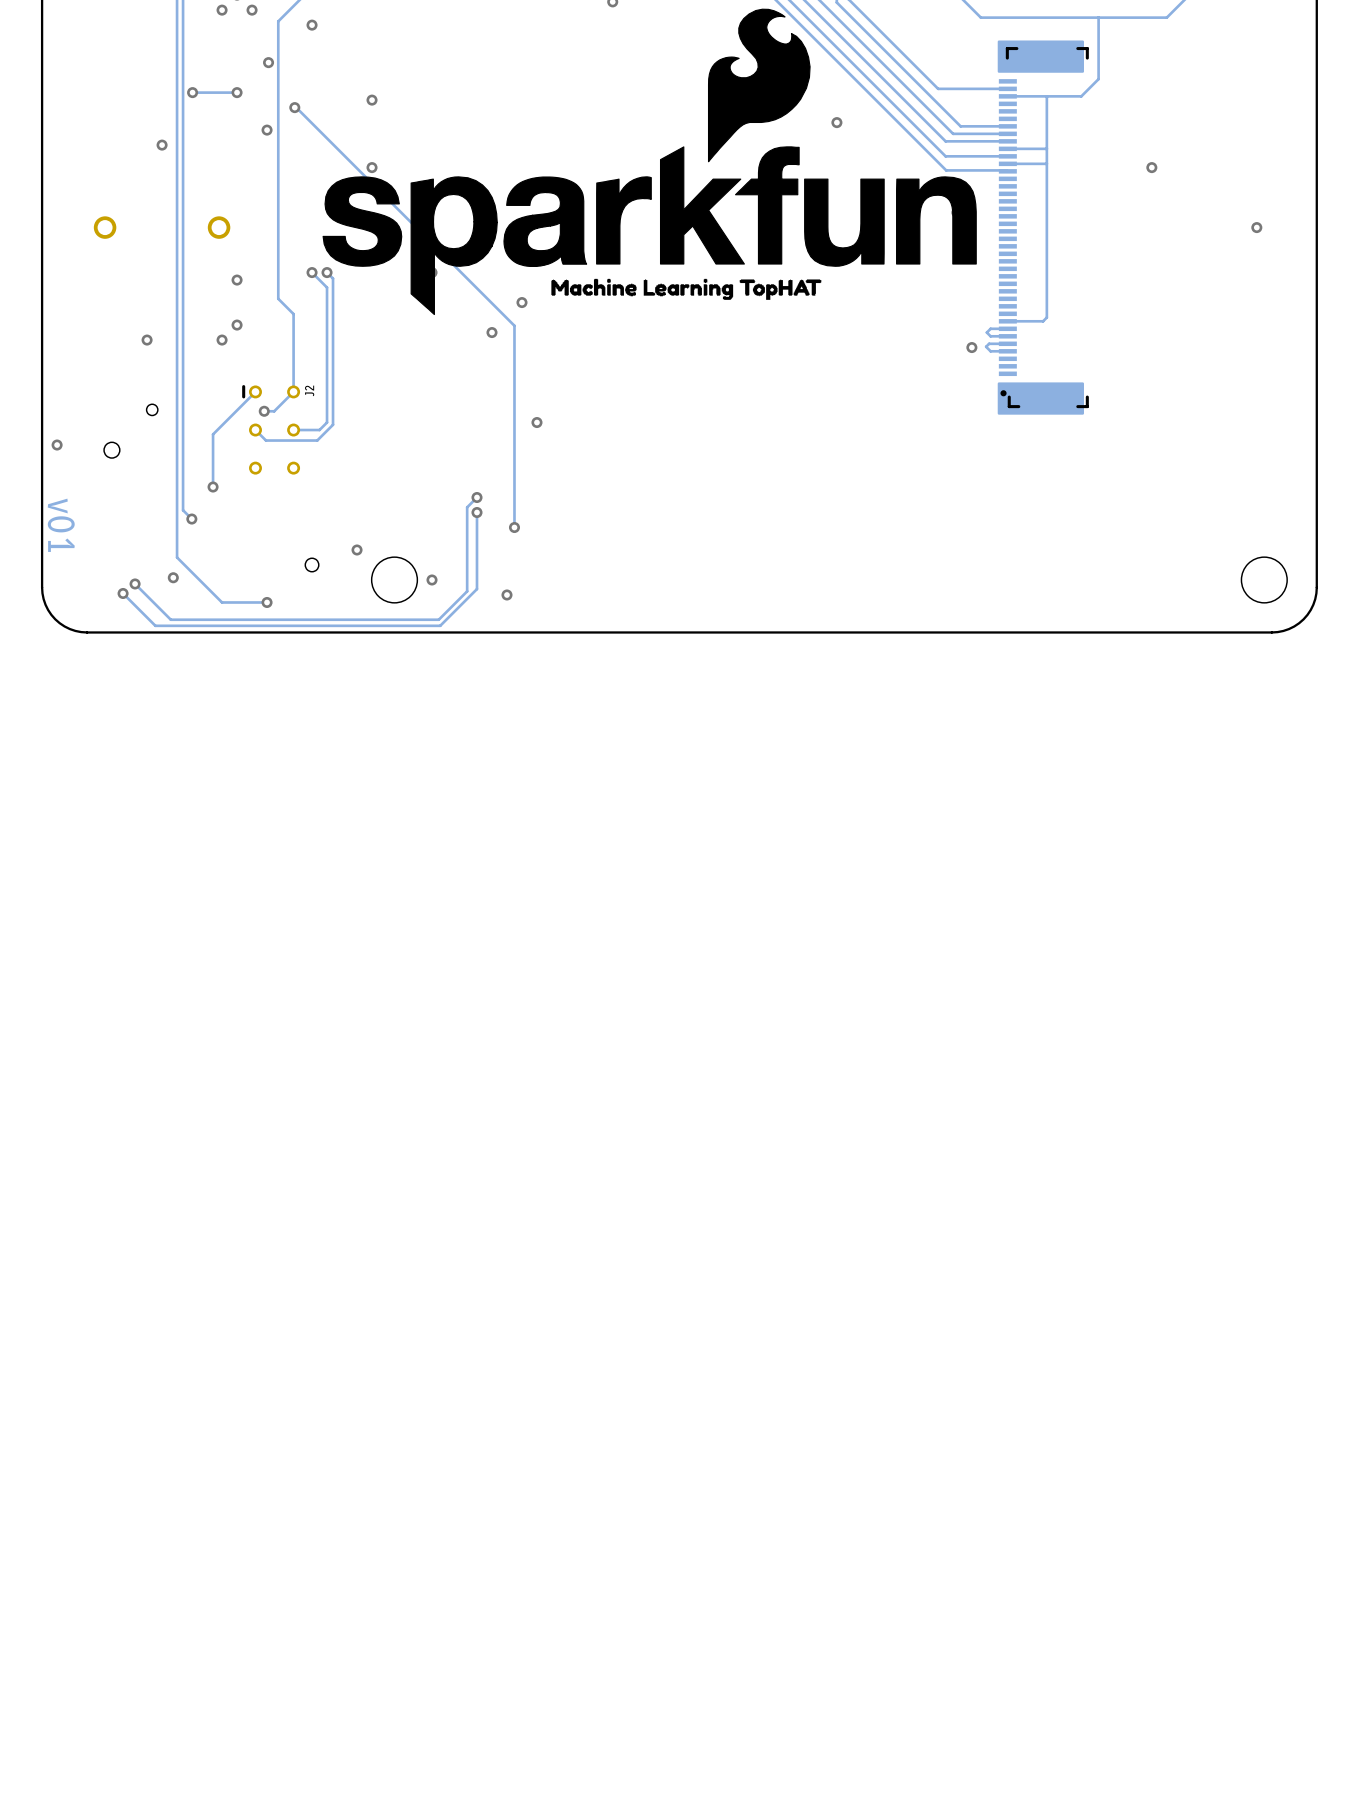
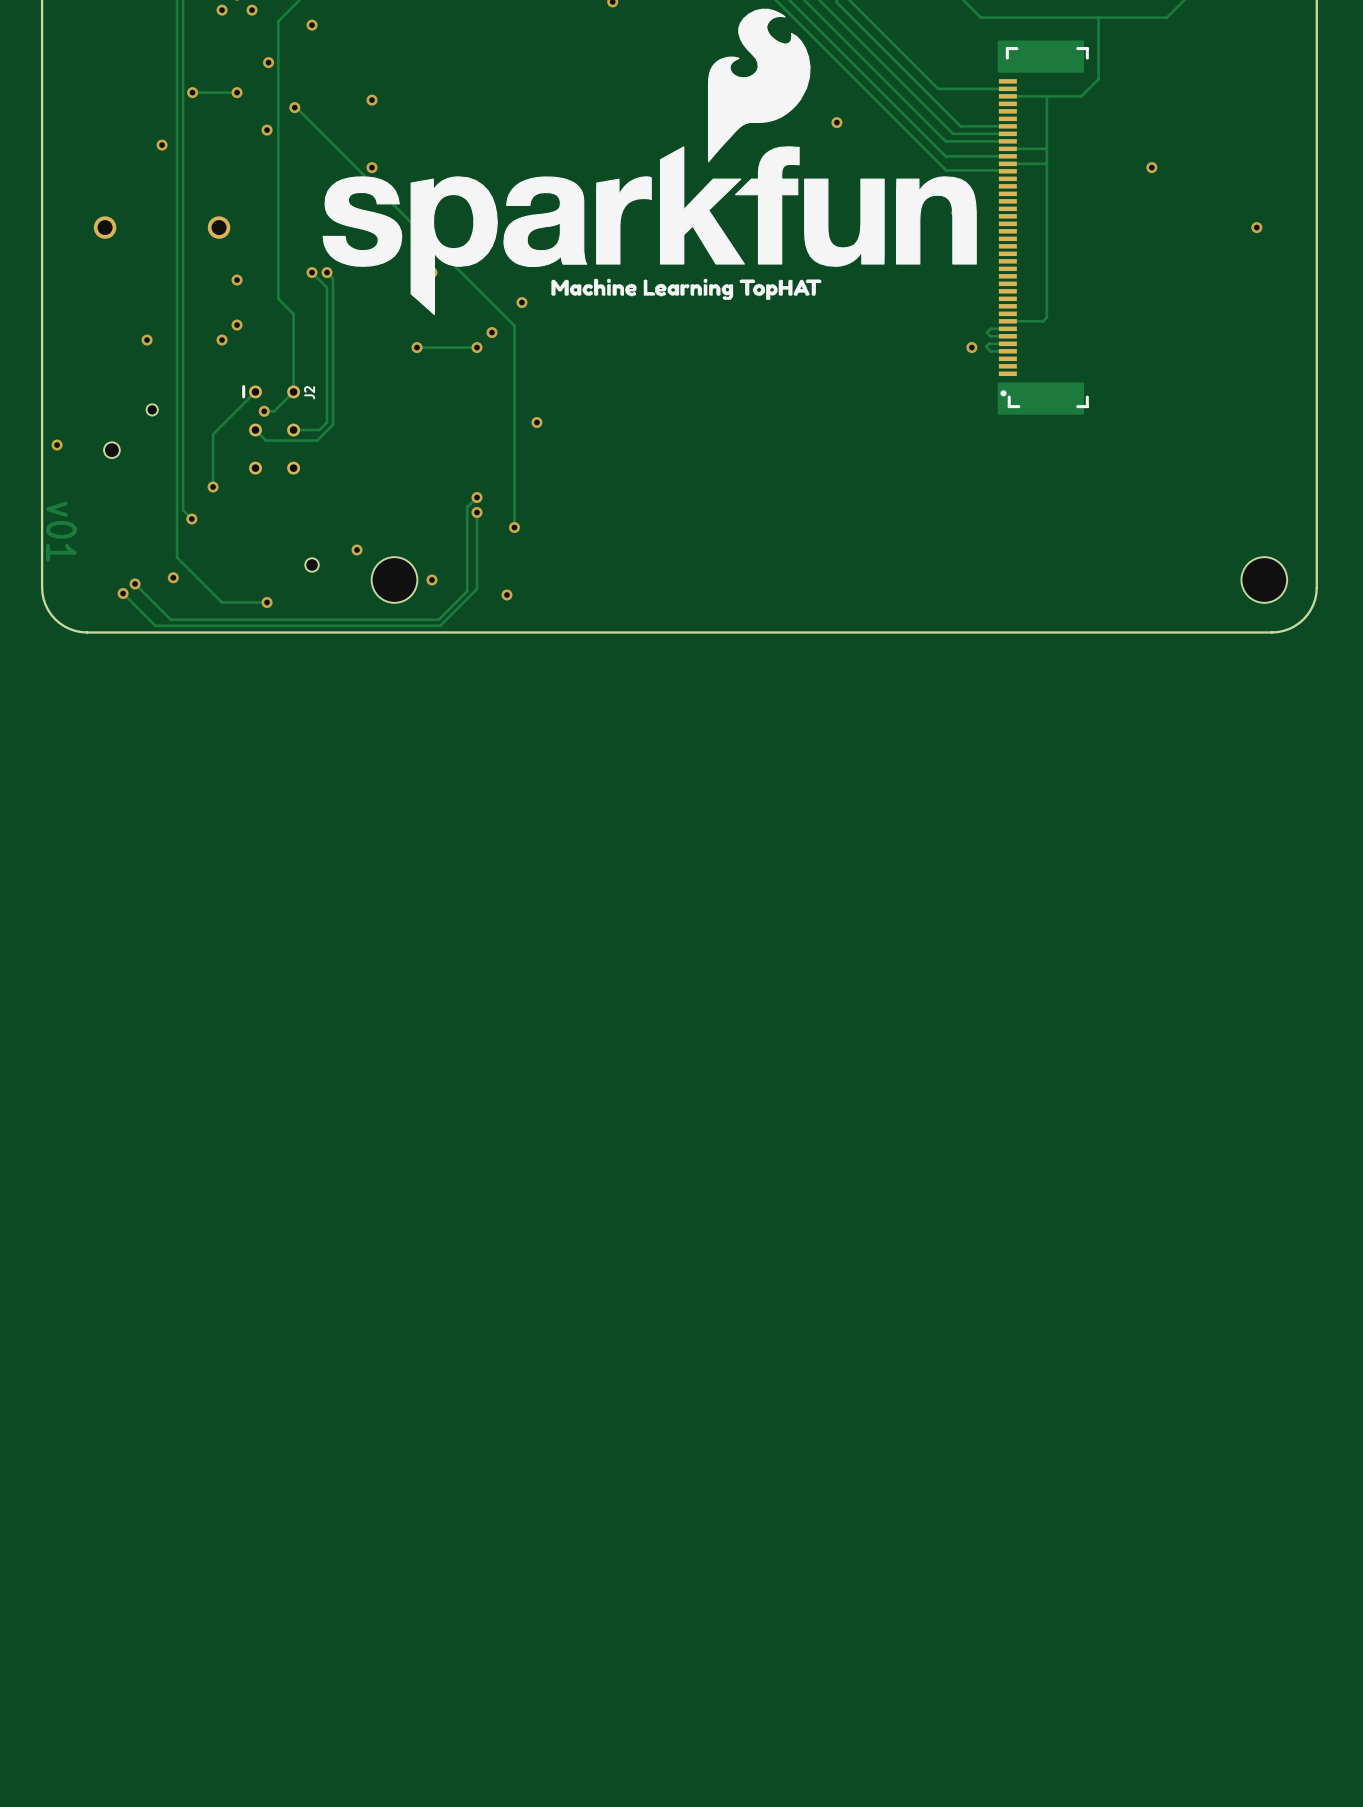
via: none -> (417, 347)
track: none -> (476, 347) (417, 347)
via: none -> (476, 347)

